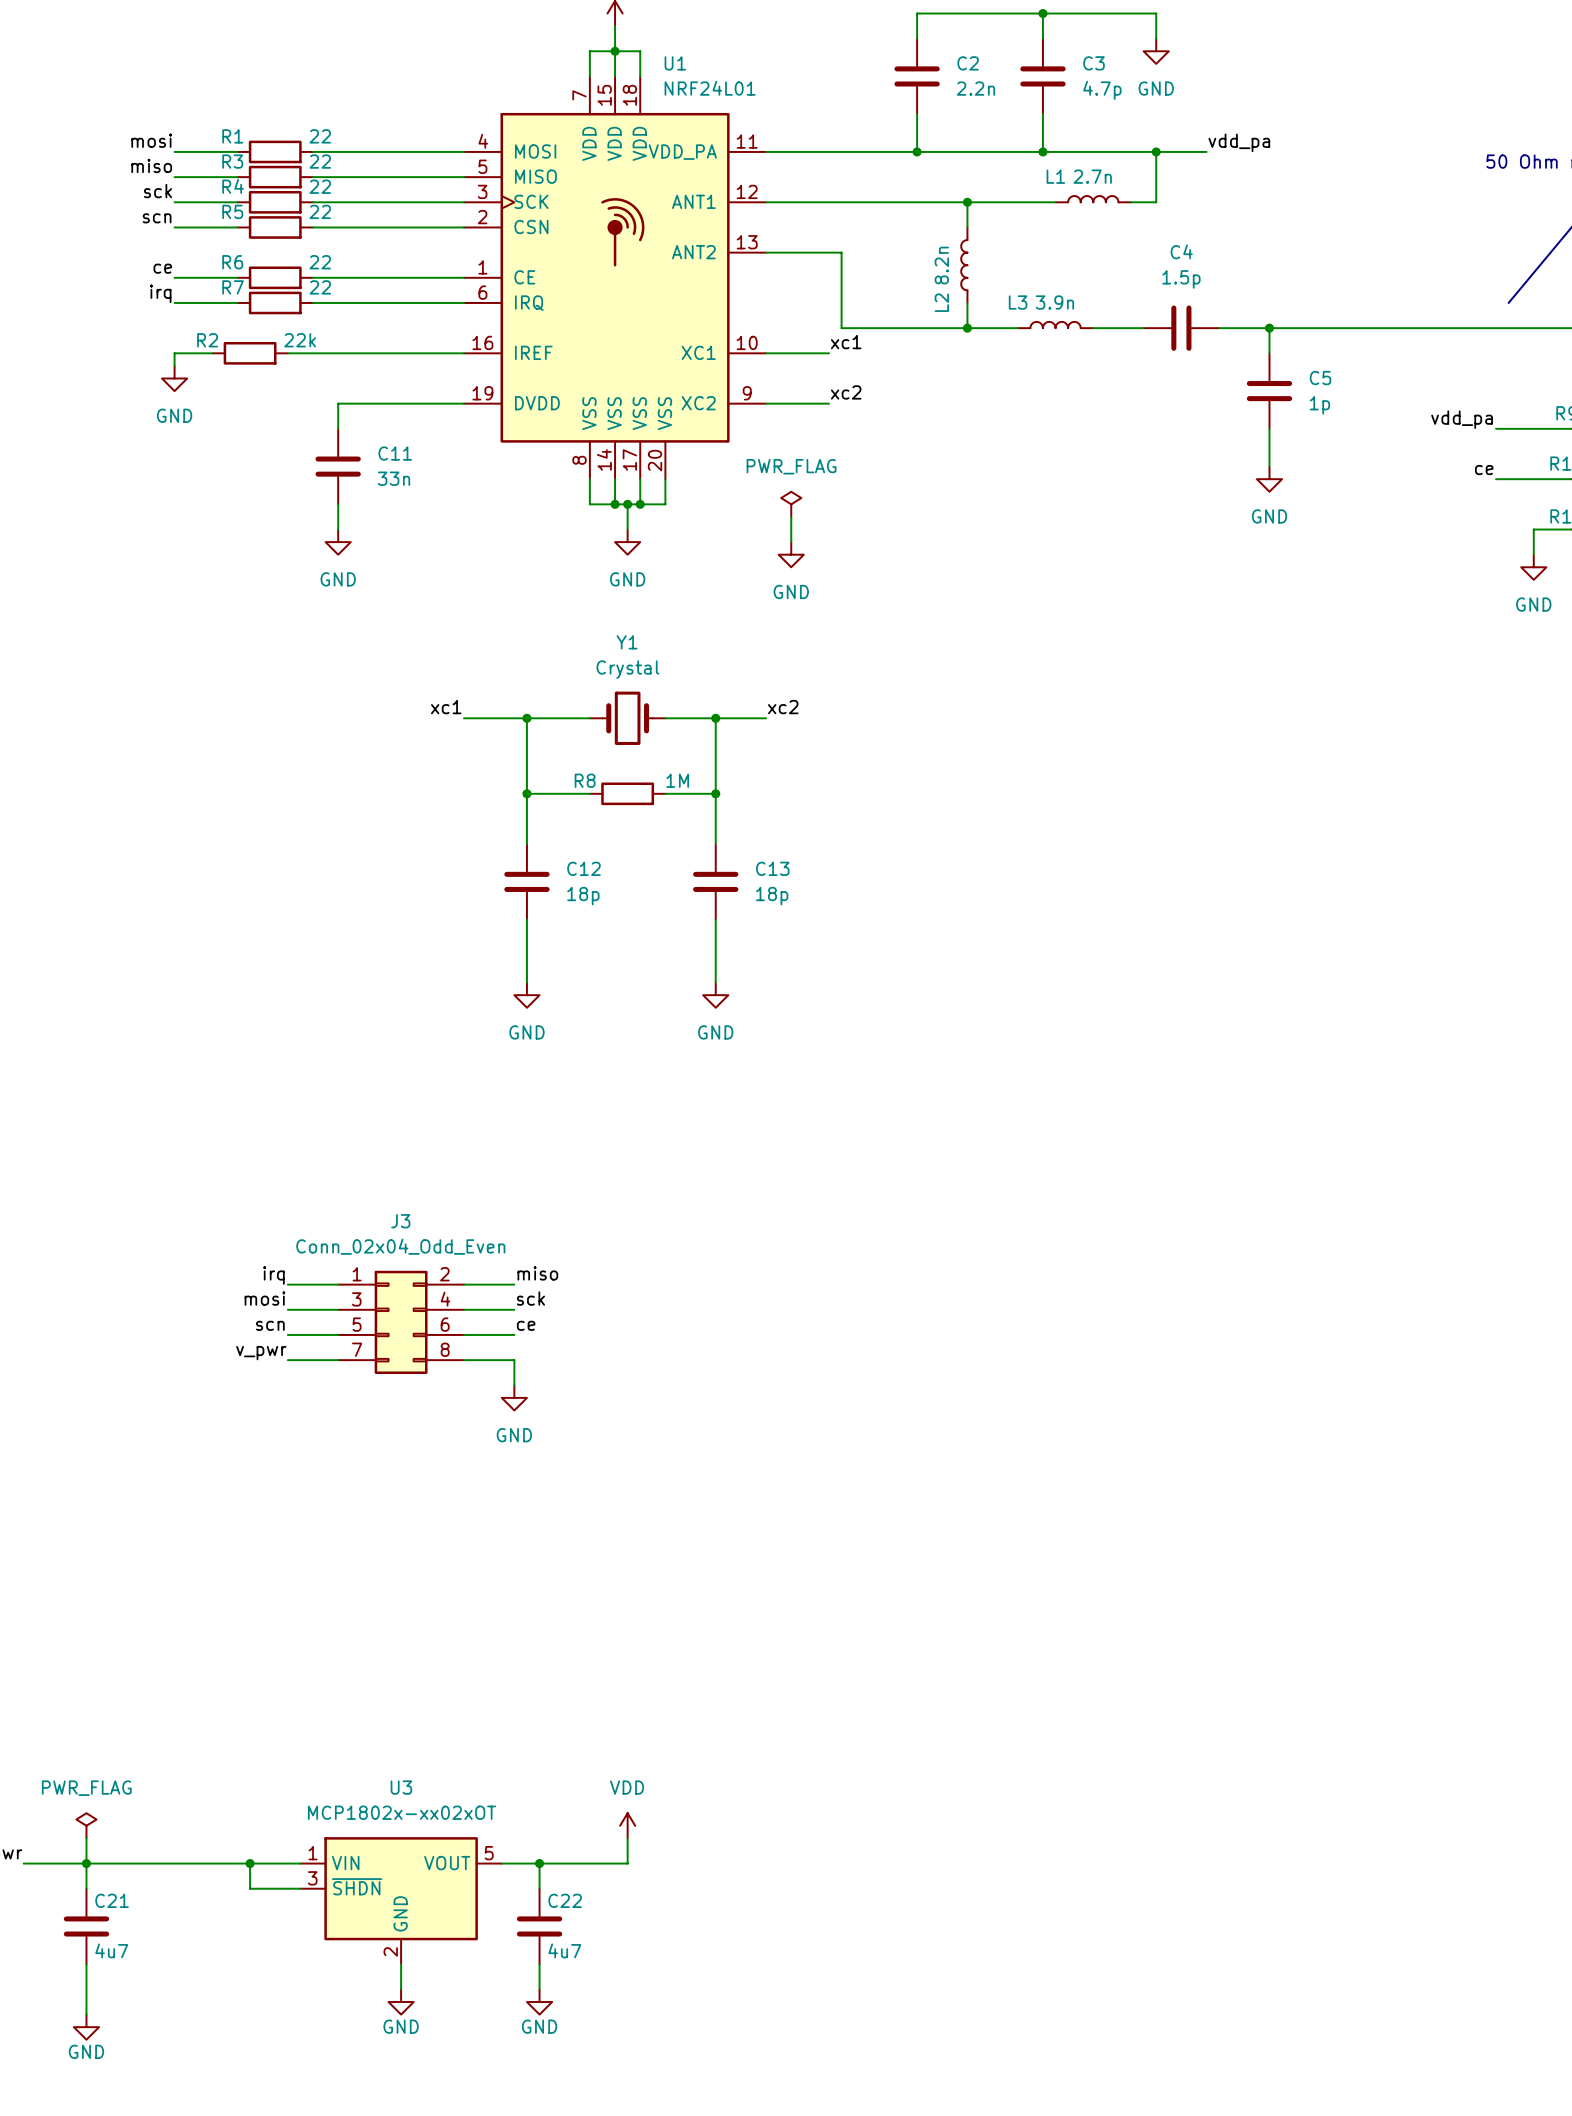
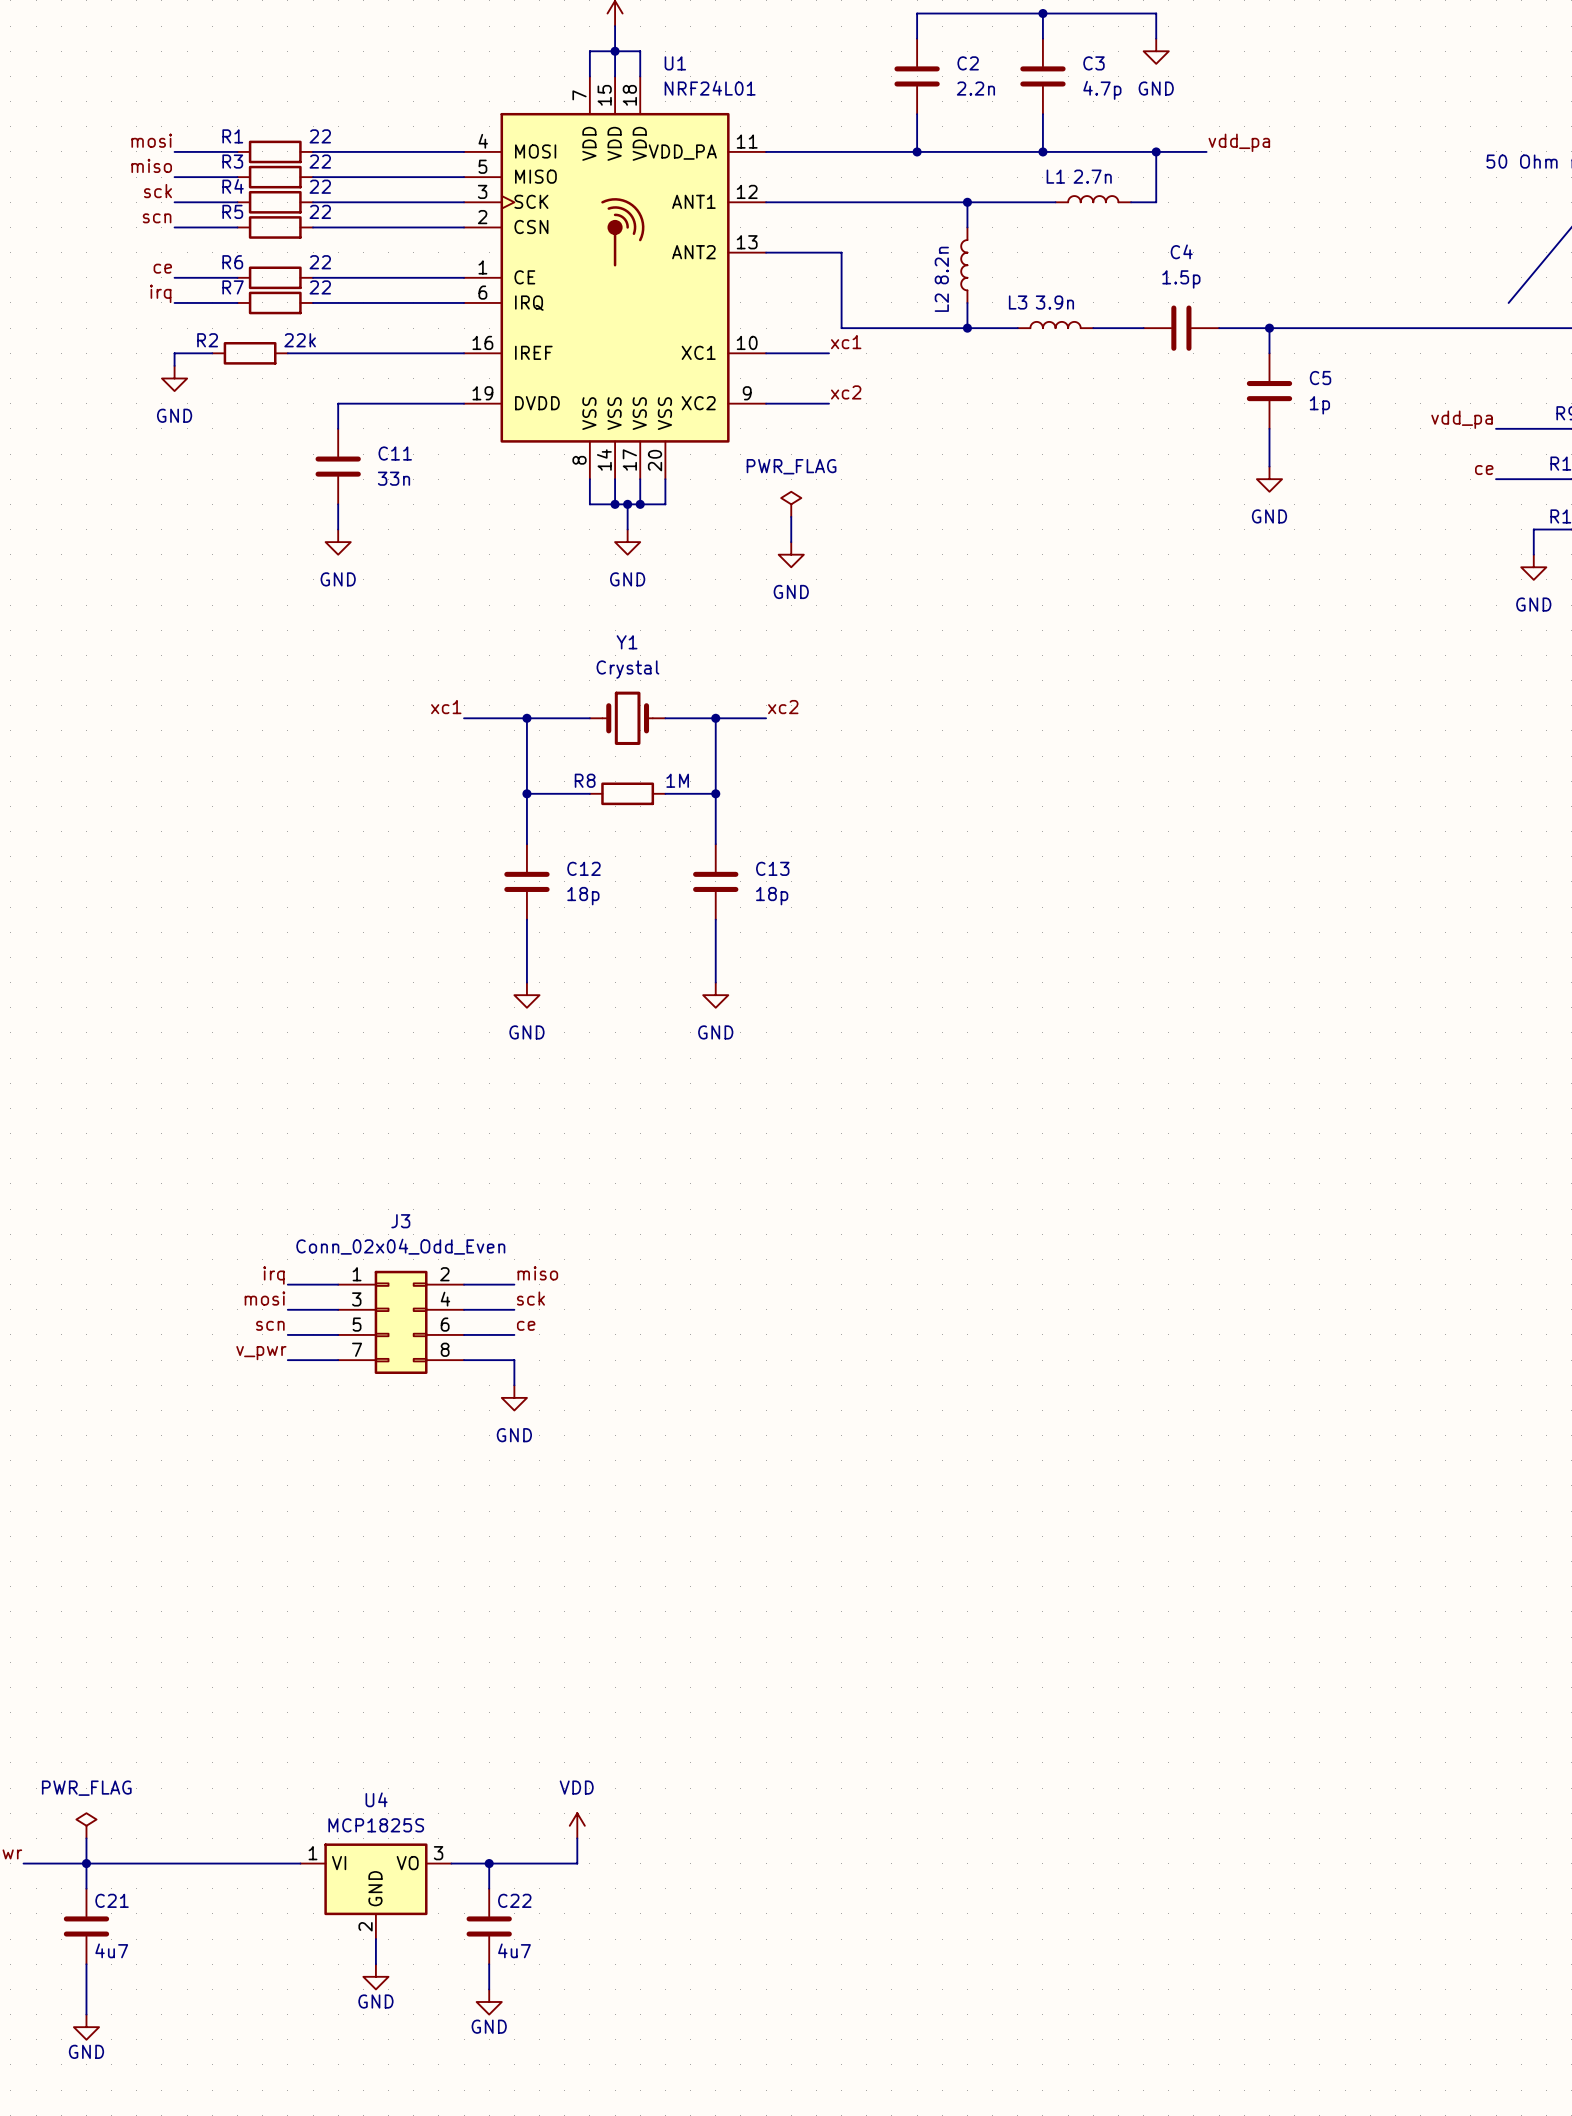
power symbol position: VDD (627, 1825) -> VDD (577, 1825)
wire: (627, 1838) (627, 1863) (577, 1863) -> (577, 1838) (577, 1863)
wire: (250, 1863) (250, 1888) (300, 1888) -> none
junction: (250, 1863) -> none
wire: (539, 1863) (539, 1888) -> (489, 1863) (489, 1888)
junction position: (539, 1863) -> (489, 1863)
U4: none -> MCP1825S (375, 1891)
U3: MCP1802x-xx02xOT (401, 1900) -> none
C22 position: (539, 1926) -> (489, 1926)
wire: (401, 1964) (401, 1989) -> (375, 1939) (375, 1964)
wire: (539, 1964) (539, 1989) -> (489, 1964) (489, 1989)
power symbol position: GND (401, 2001) -> GND (375, 1976)
power symbol: none -> GND (489, 2001)
power symbol: GND (539, 2001) -> none

